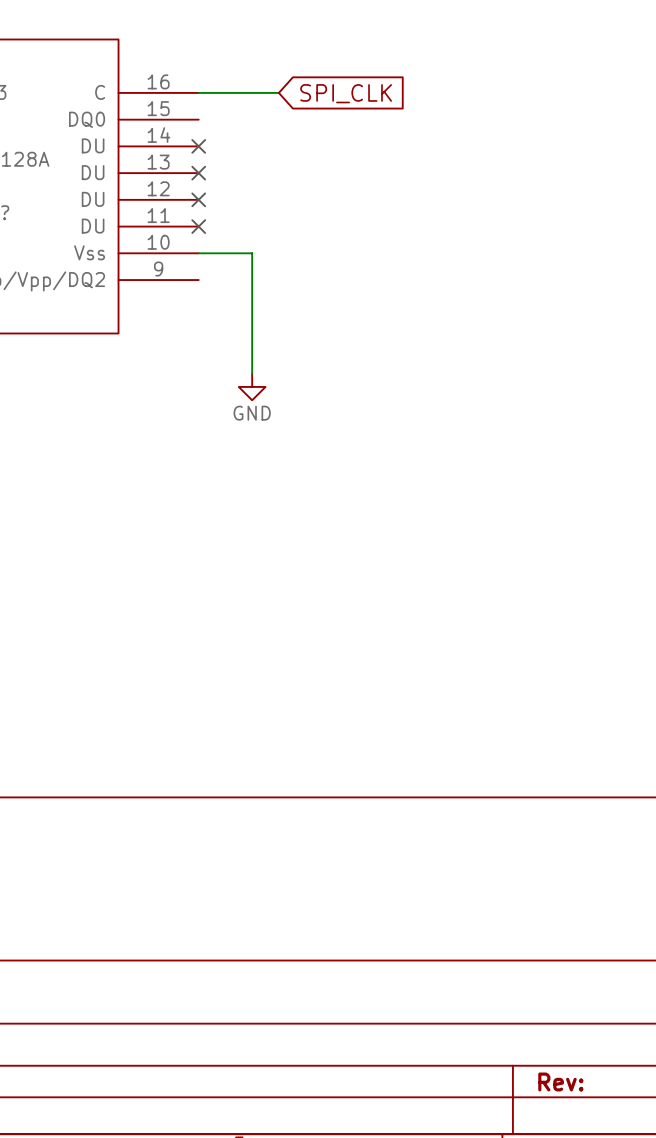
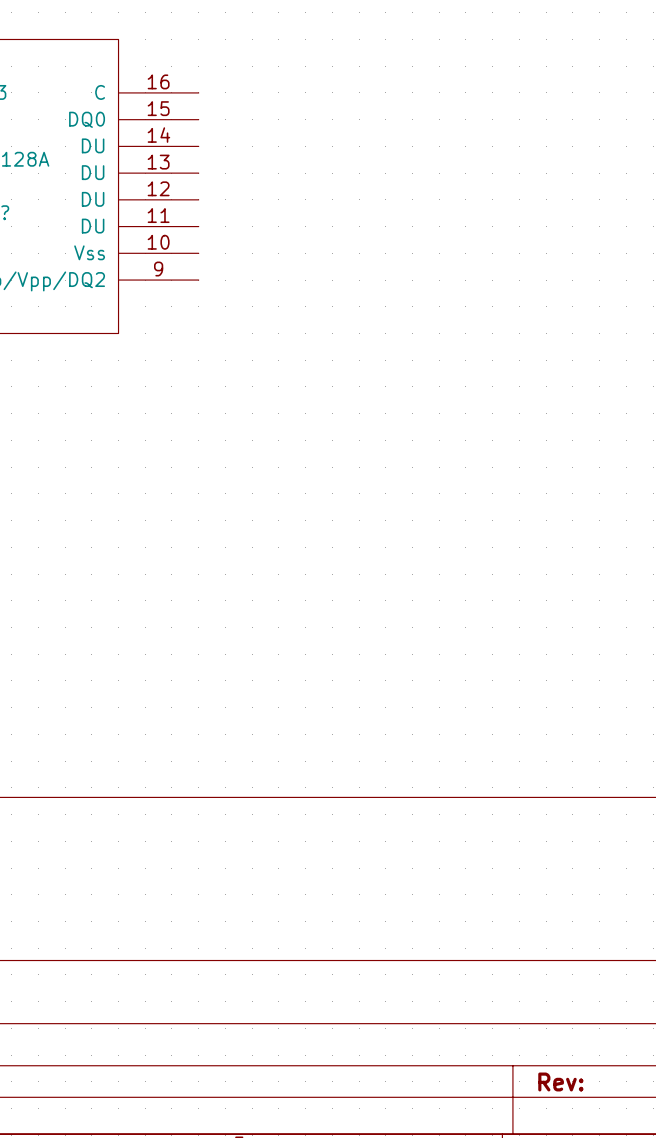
wire: (198, 92) (278, 92) -> none
global label: SPI_CLK (346, 93) -> none
no-connect mark: (198, 146) -> none
no-connect mark: (198, 173) -> none
no-connect mark: (198, 199) -> none
no-connect mark: (198, 226) -> none
wire: (198, 253) (252, 253) (252, 373) -> none
power symbol: GND (252, 386) -> none

